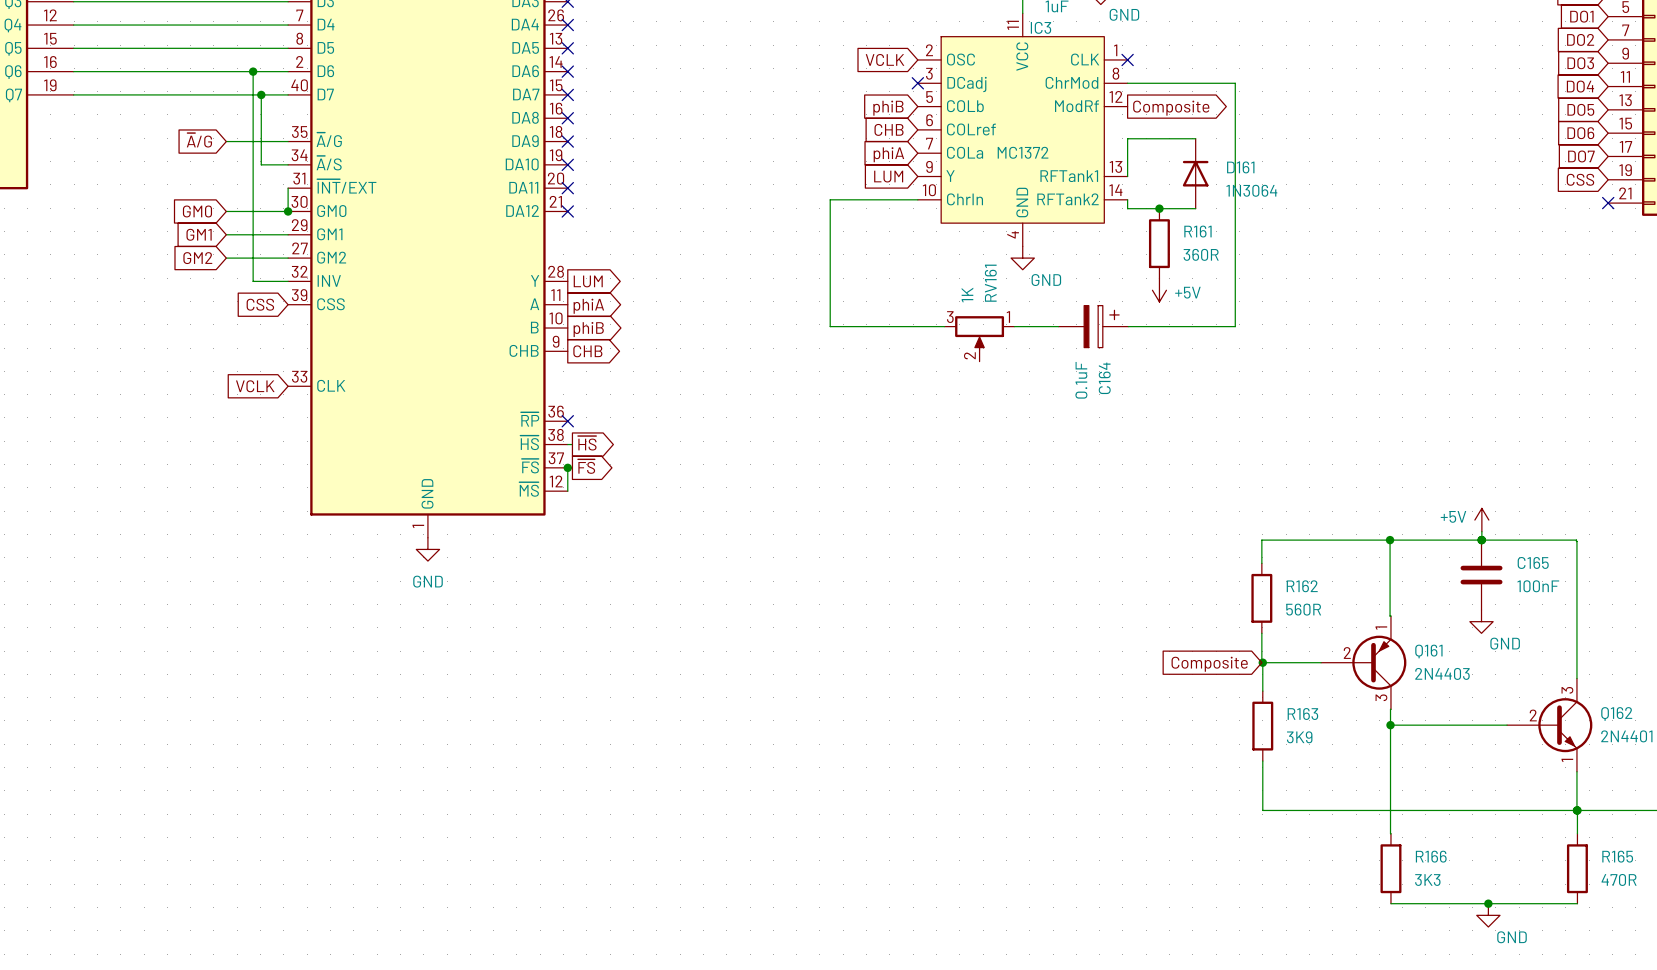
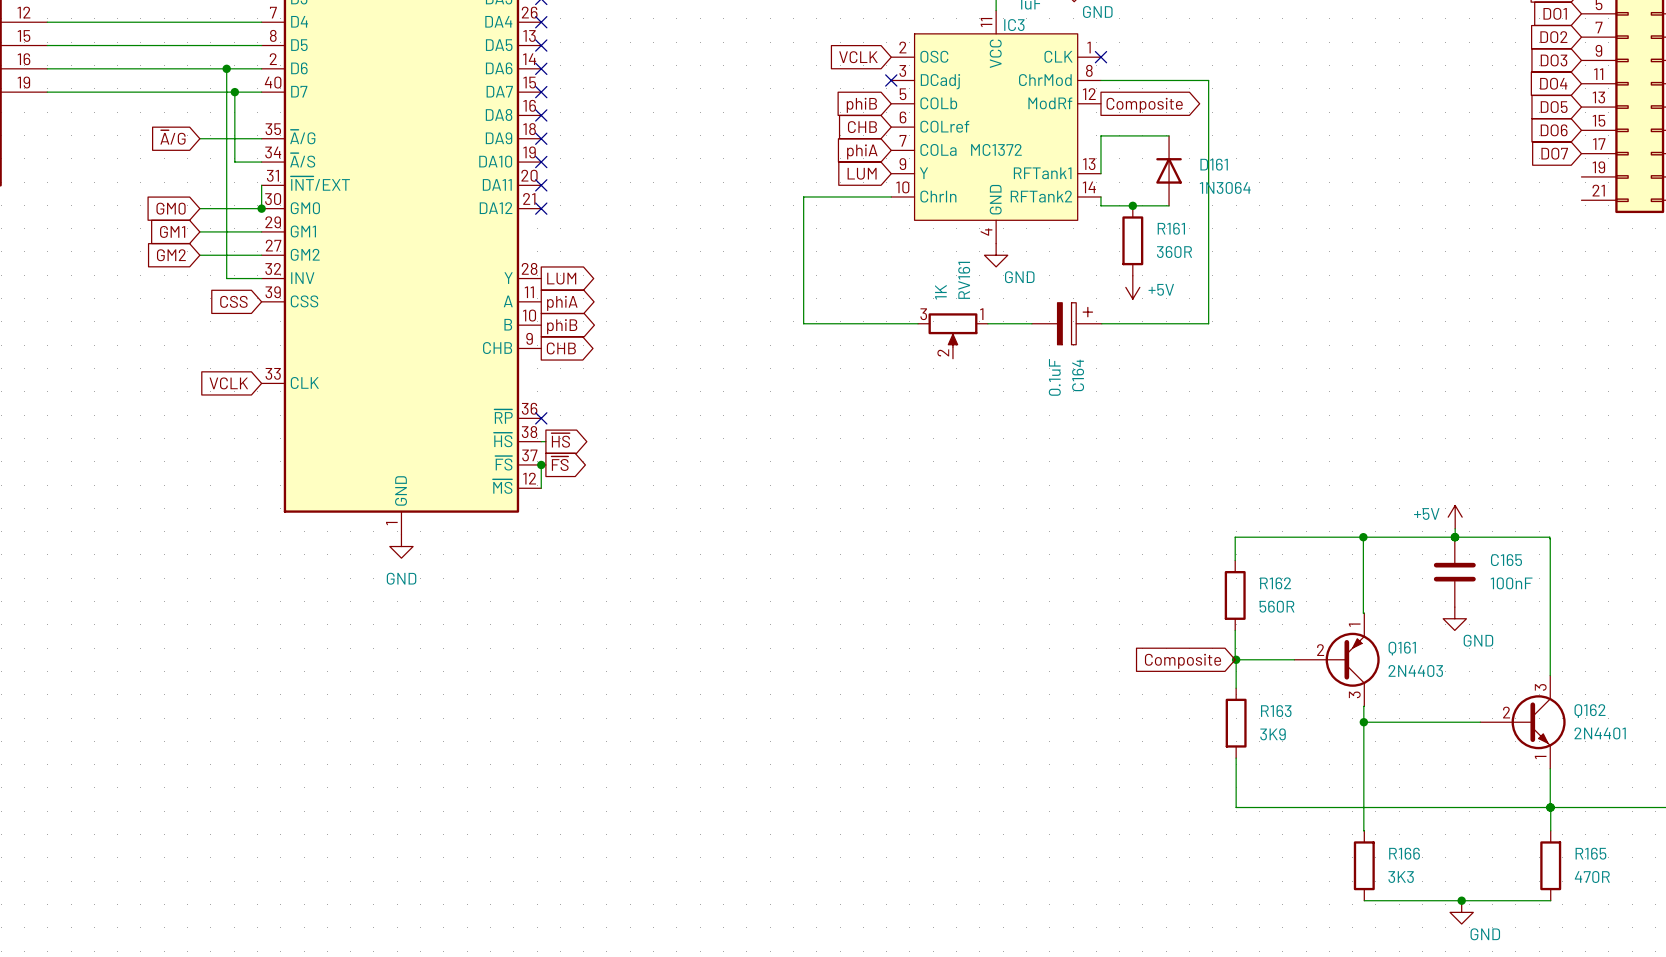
global label: CSS (1580, 179) -> none
no-connect mark: (1608, 203) -> none

